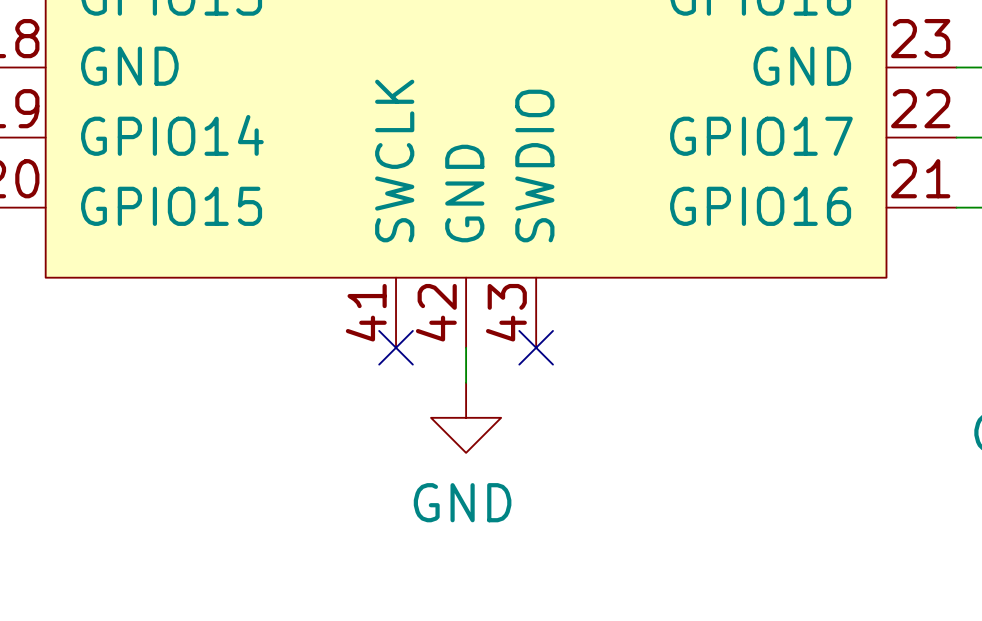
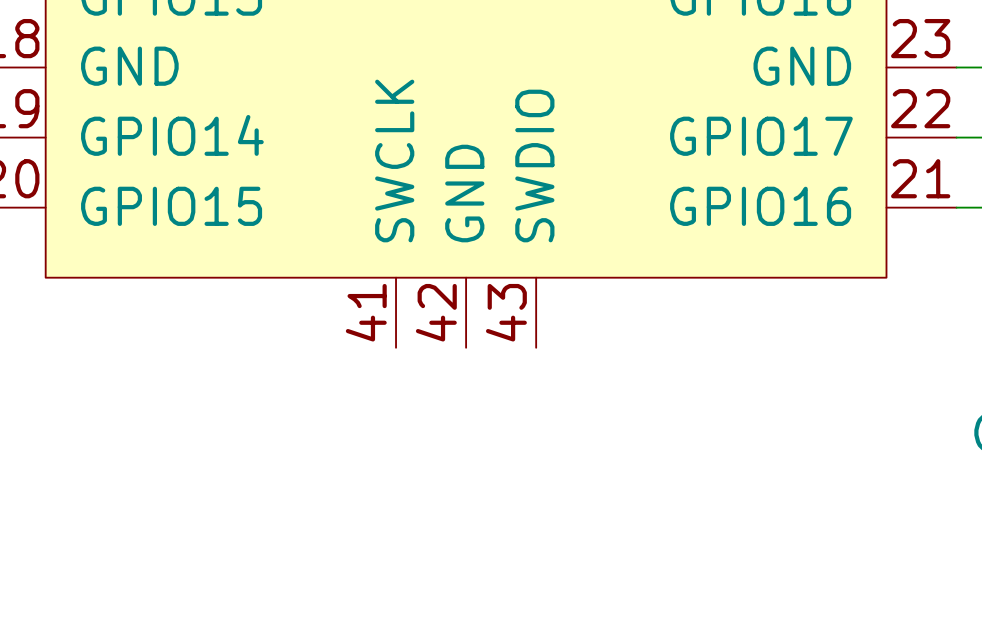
no-connect mark: (396, 347) -> none
wire: (466, 347) (466, 382) -> none
no-connect mark: (536, 347) -> none
power symbol: GND (466, 417) -> none

